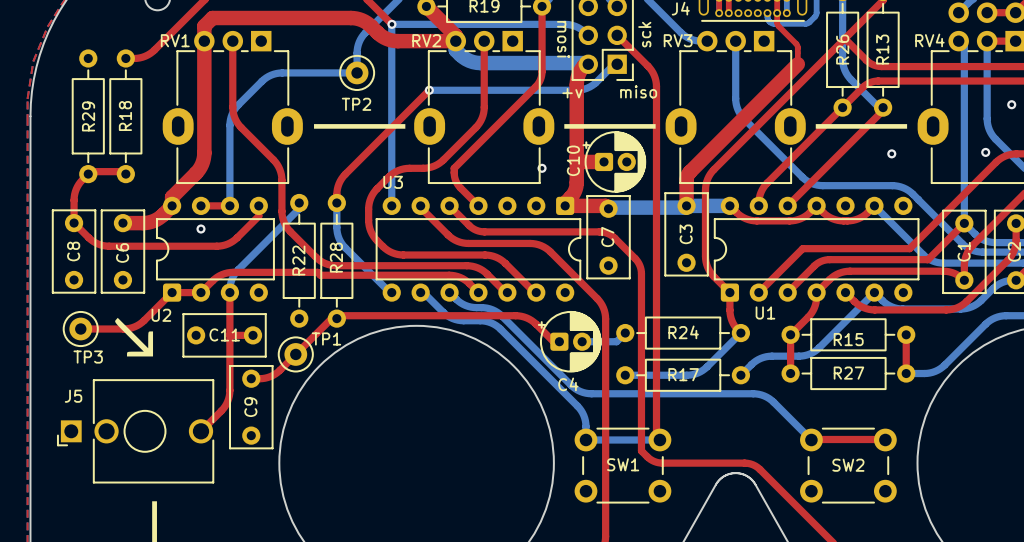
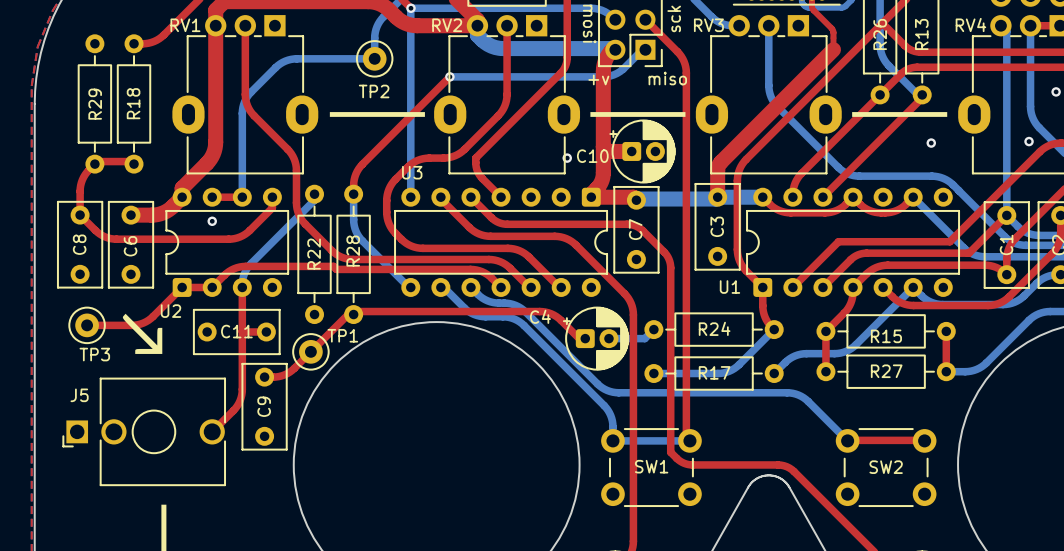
C10 name rotation: 0° (573, 160) -> 90° clockwise (592, 156)
U1 name position: U1 (765, 312) -> U1 (729, 287)
C4 name position: C4 (568, 384) -> C4 (540, 316)

